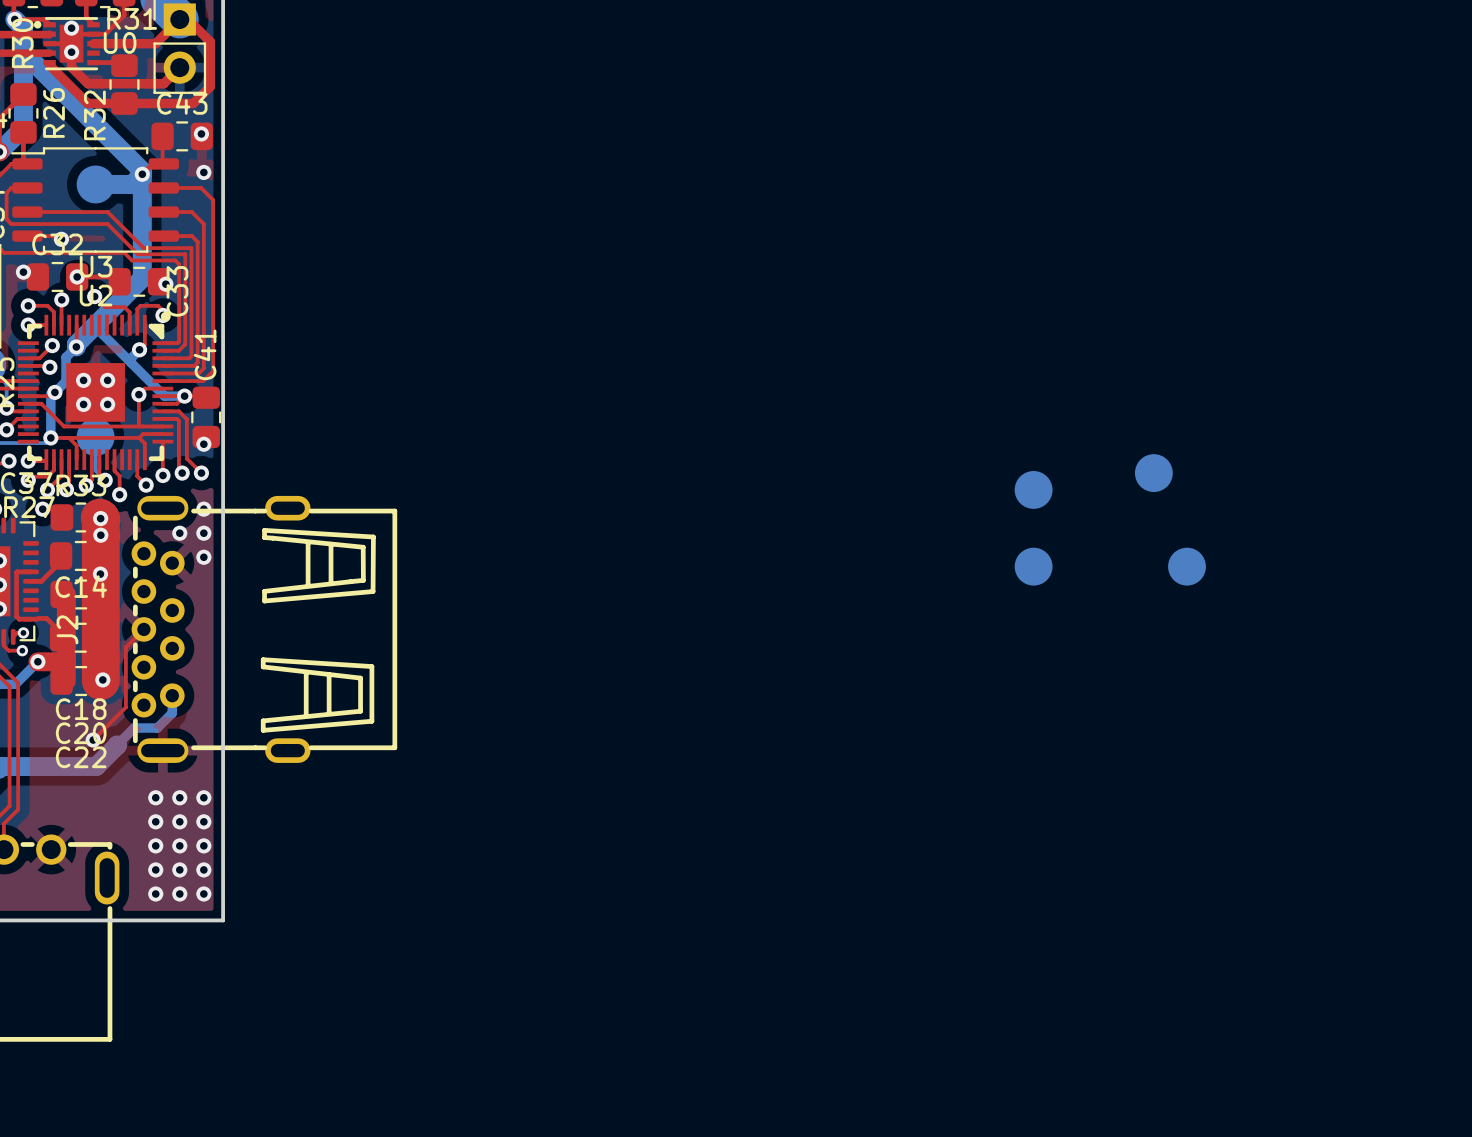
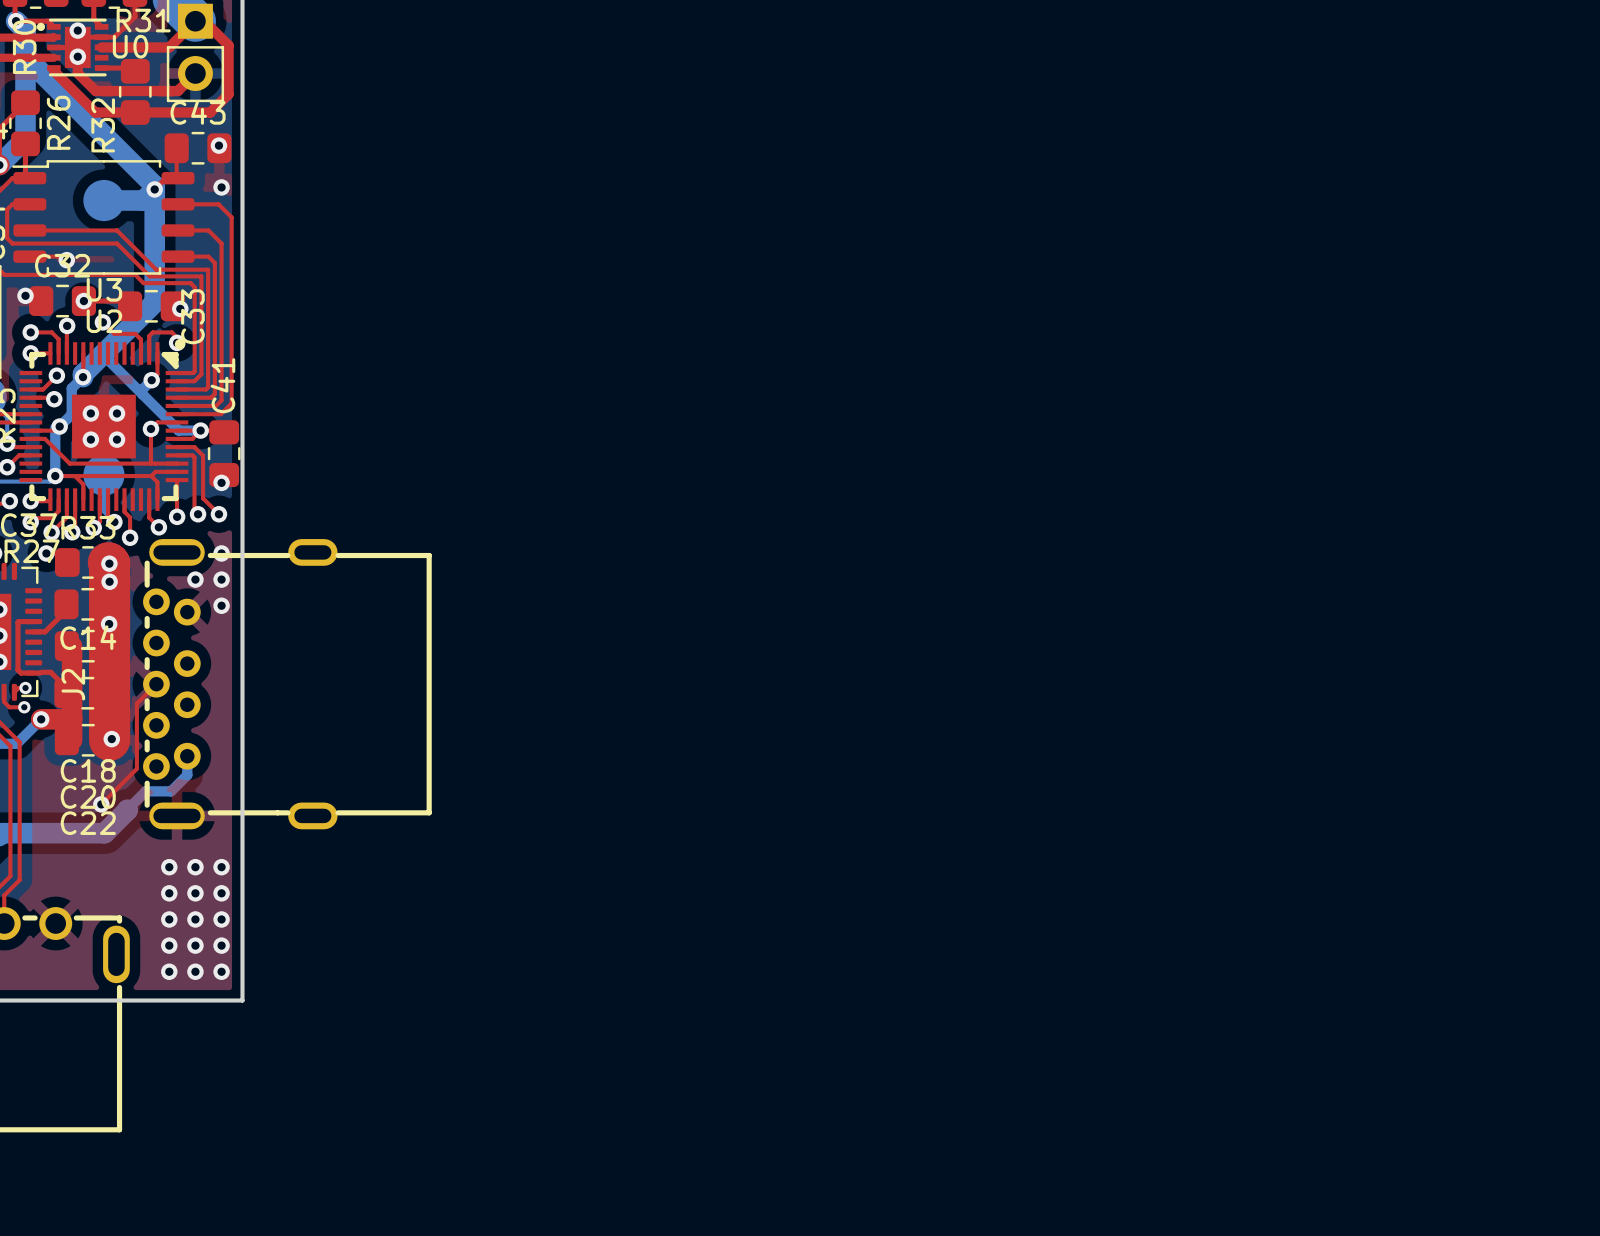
part: (1153, 473) -> none
part: (1033, 489) -> none
J2 footprint: [131, 495, 398, 763] -> [143, 539, 432, 830]
part: (1033, 566) -> none
part: (1187, 566) -> none

